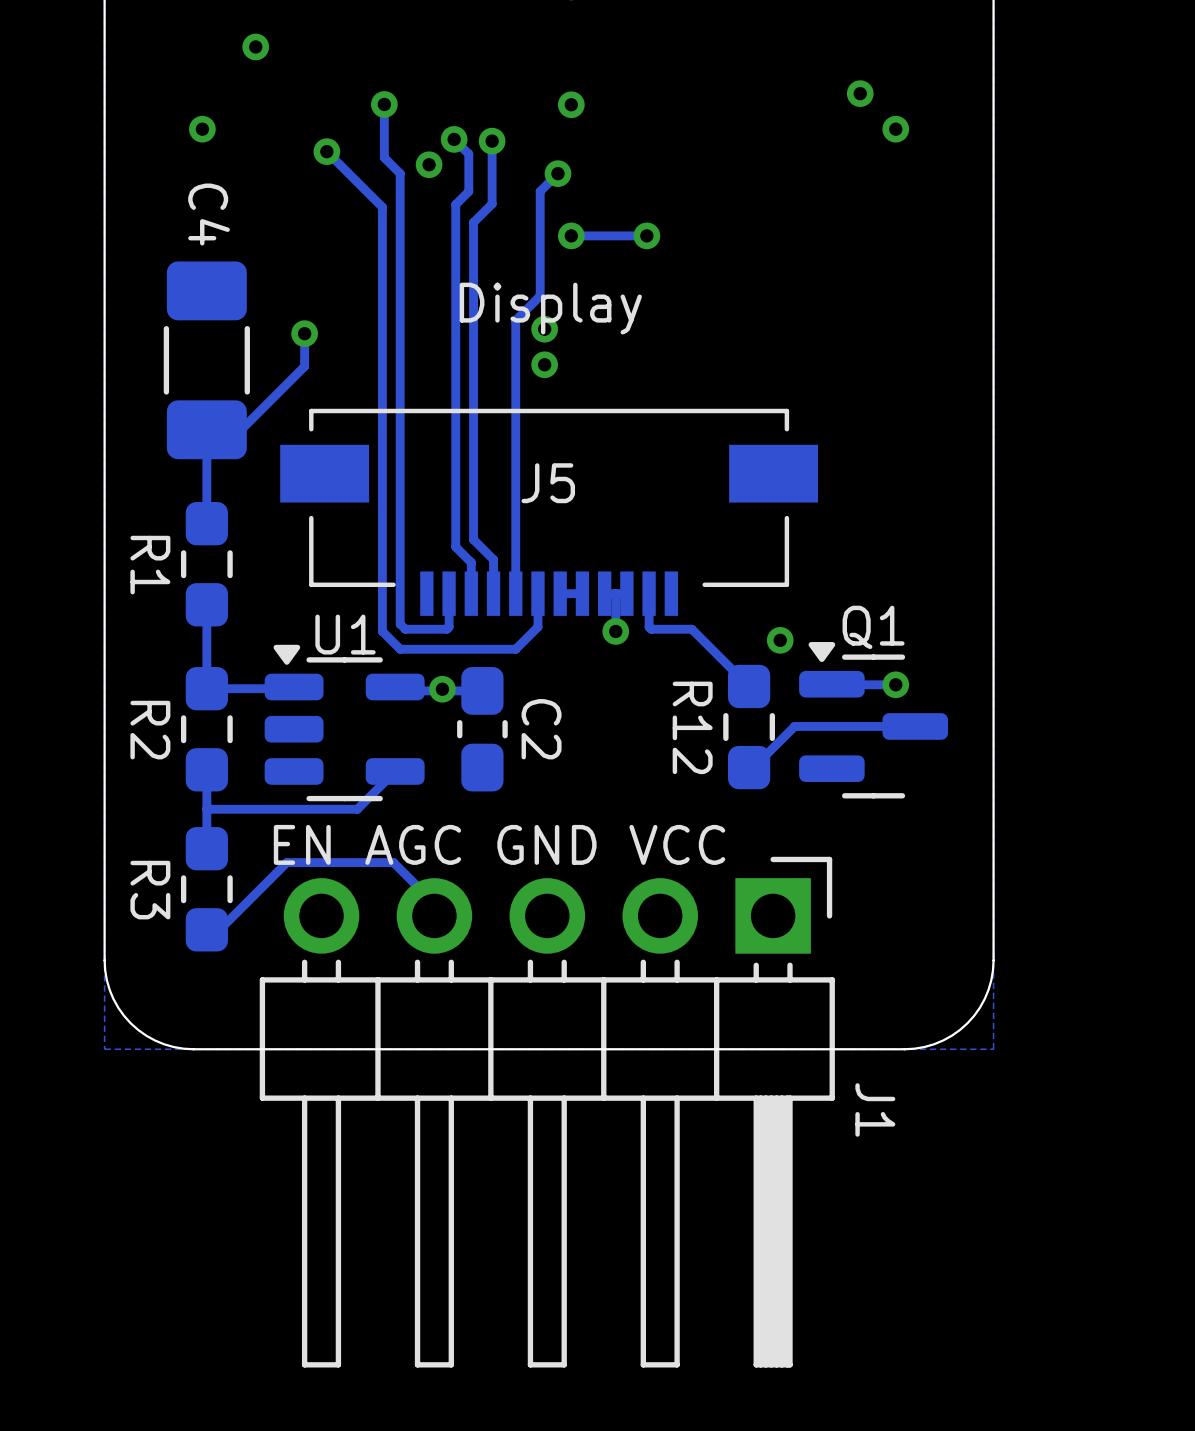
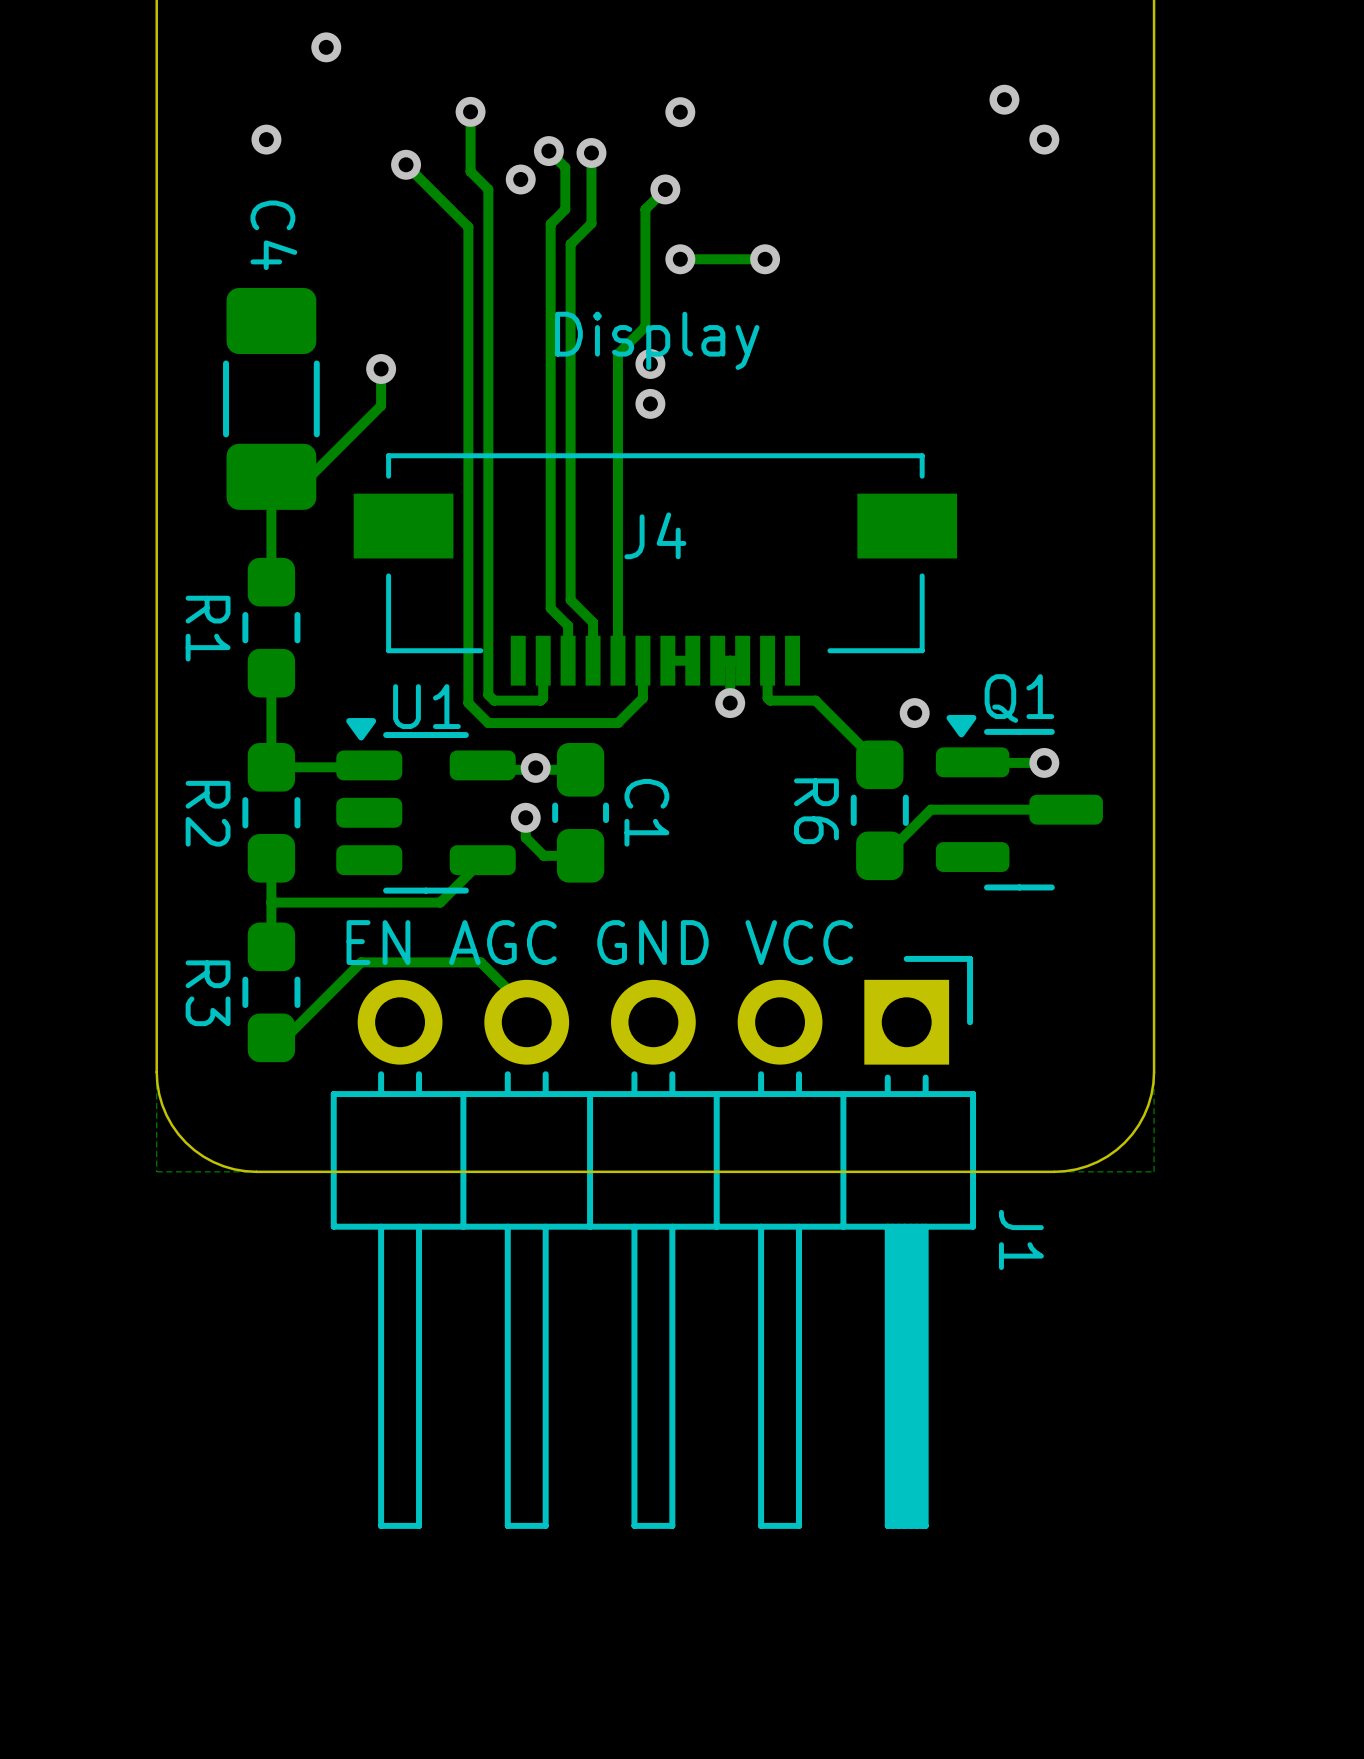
J5 name: J5 (548, 483) -> J4 (655, 535)
R12 name: R12 (692, 727) -> R6 (816, 811)
C2 name: C2 (541, 729) -> C1 (646, 812)
track: none -> (525, 817) (525, 837) (543, 855) (580, 855)
via: none -> (525, 817)

